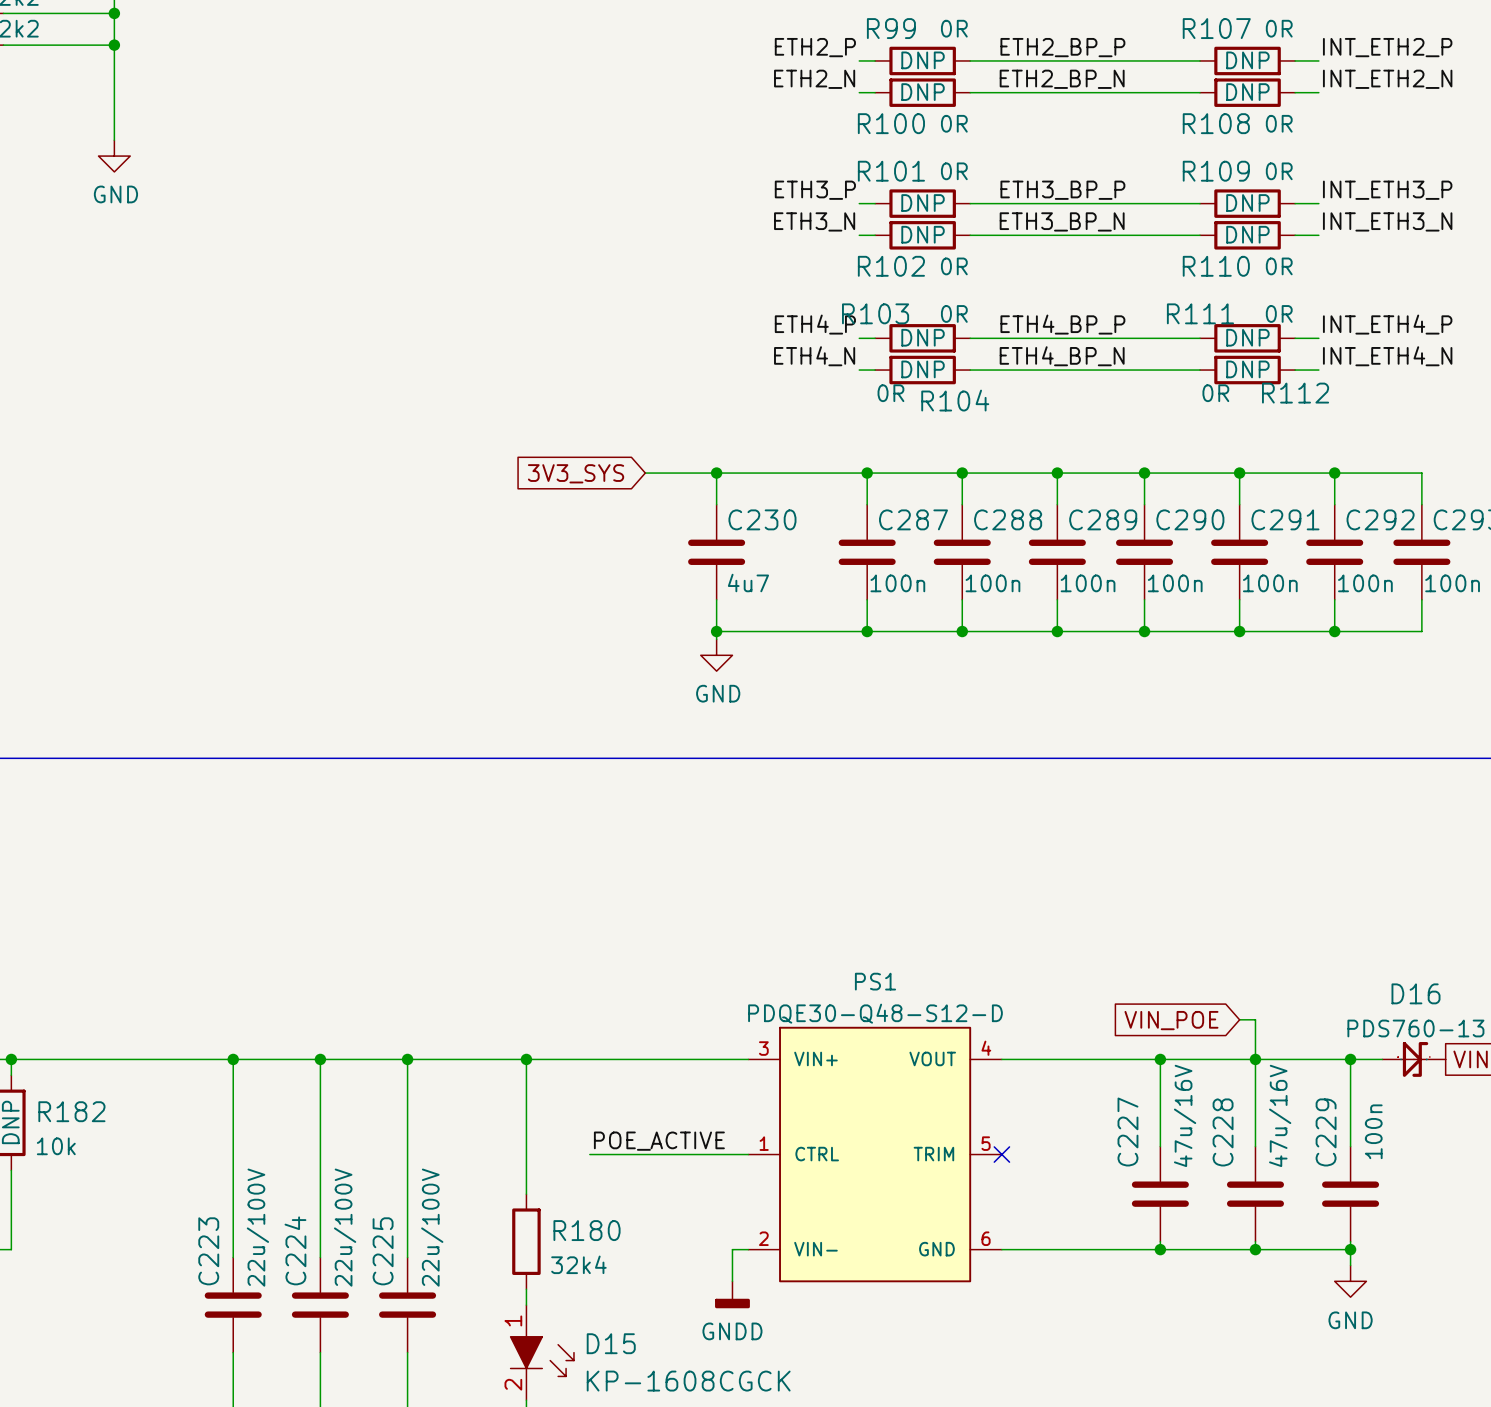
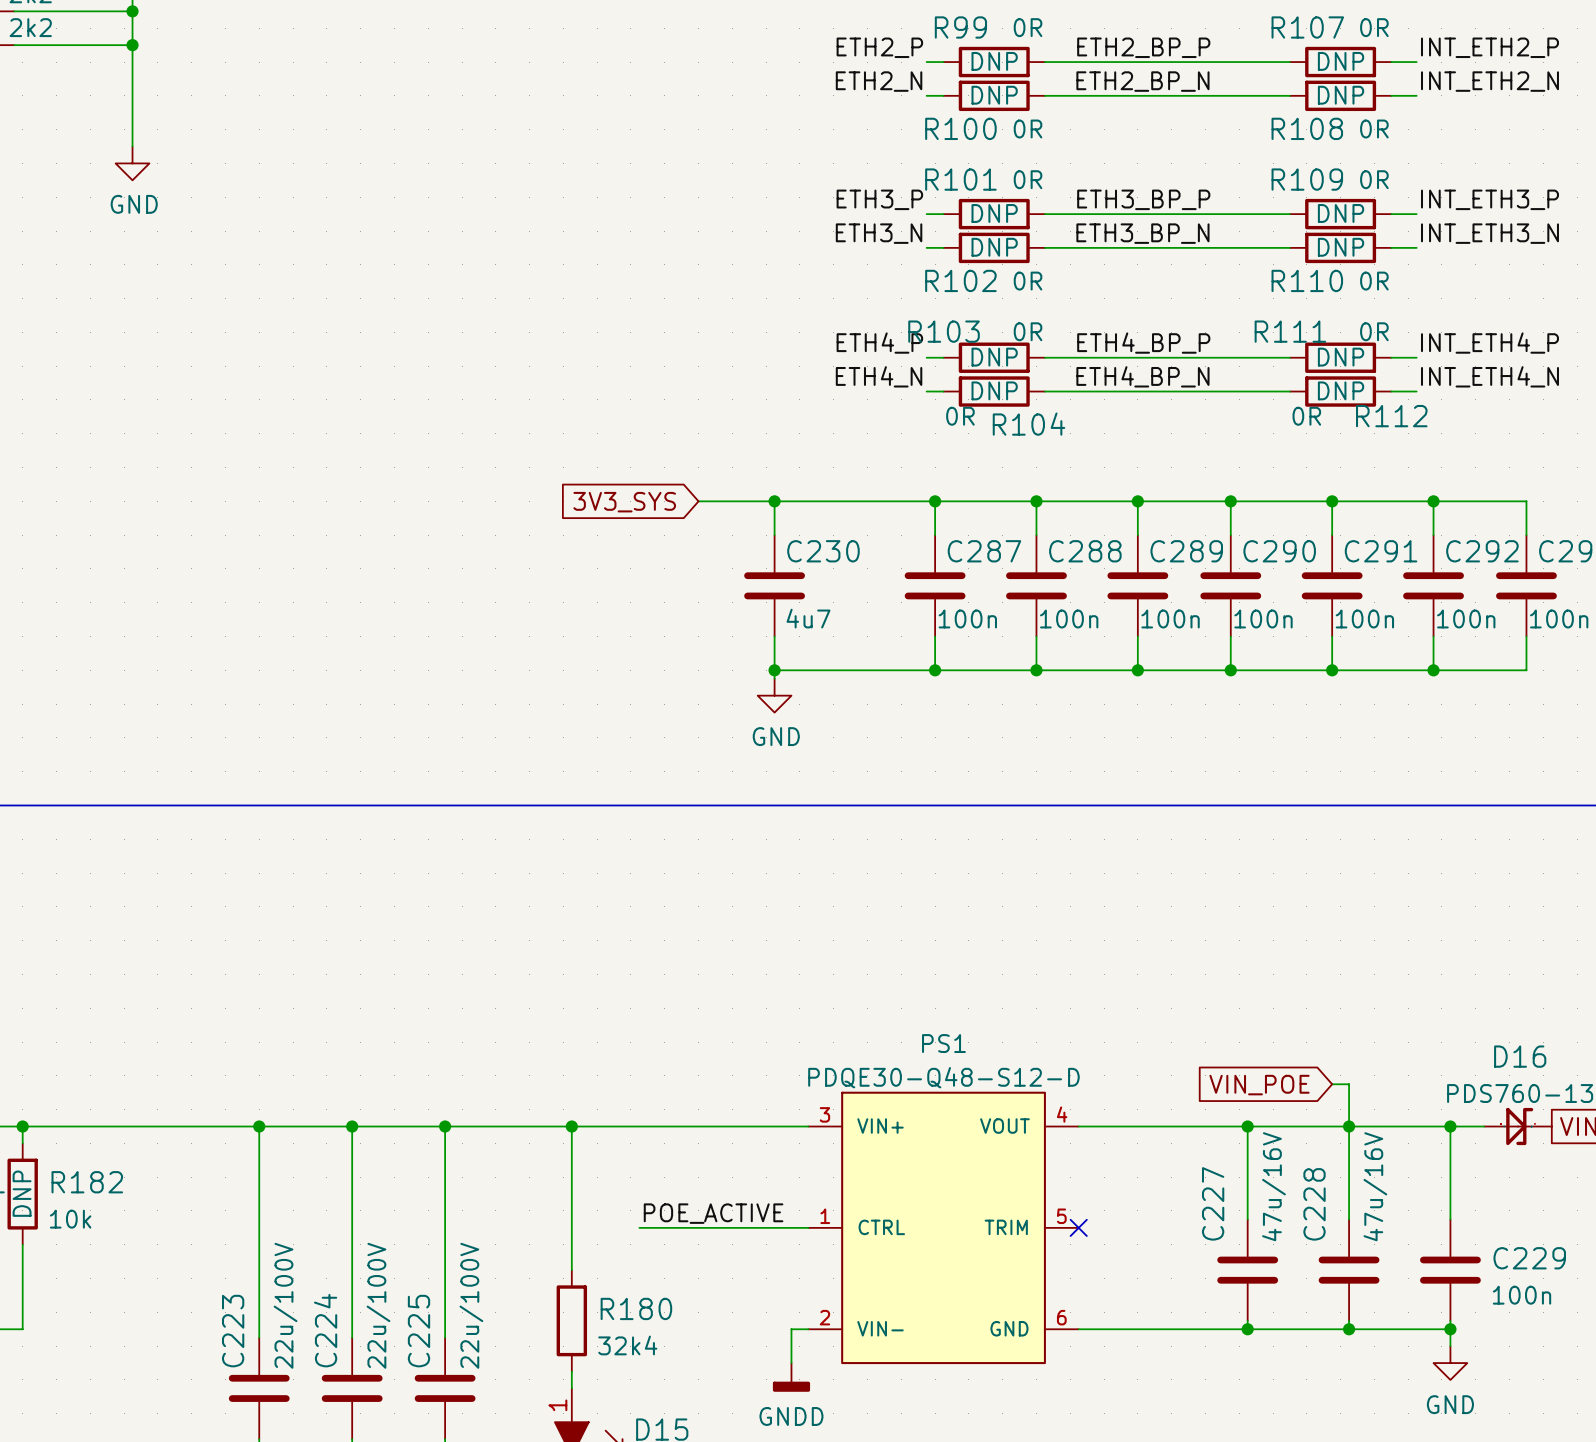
C229 text rotation: 0° (1373, 1131) -> 90° clockwise (1522, 1295)
C229 text position: 100n (1373, 1131) -> 100n (1522, 1295)
C229 name rotation: 0° (1326, 1132) -> 90° clockwise (1529, 1258)
C229 name position: C229 (1326, 1132) -> C229 (1529, 1258)

